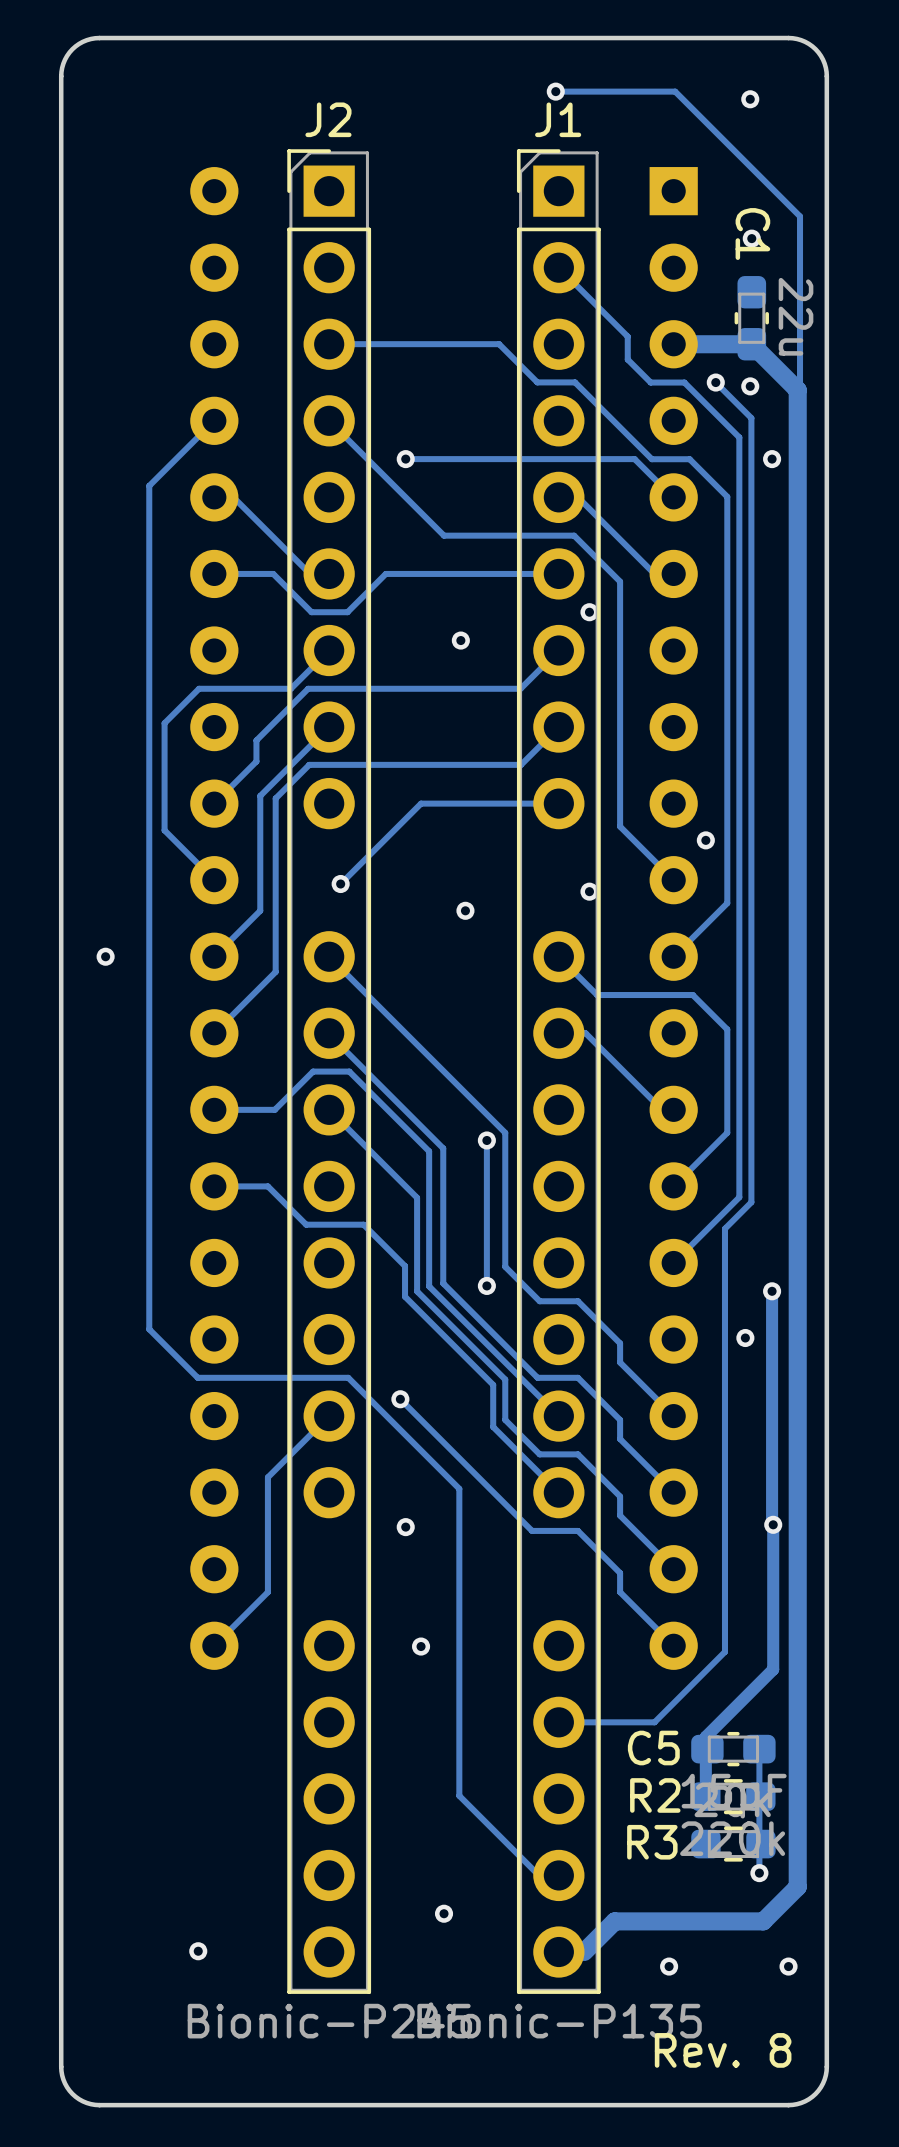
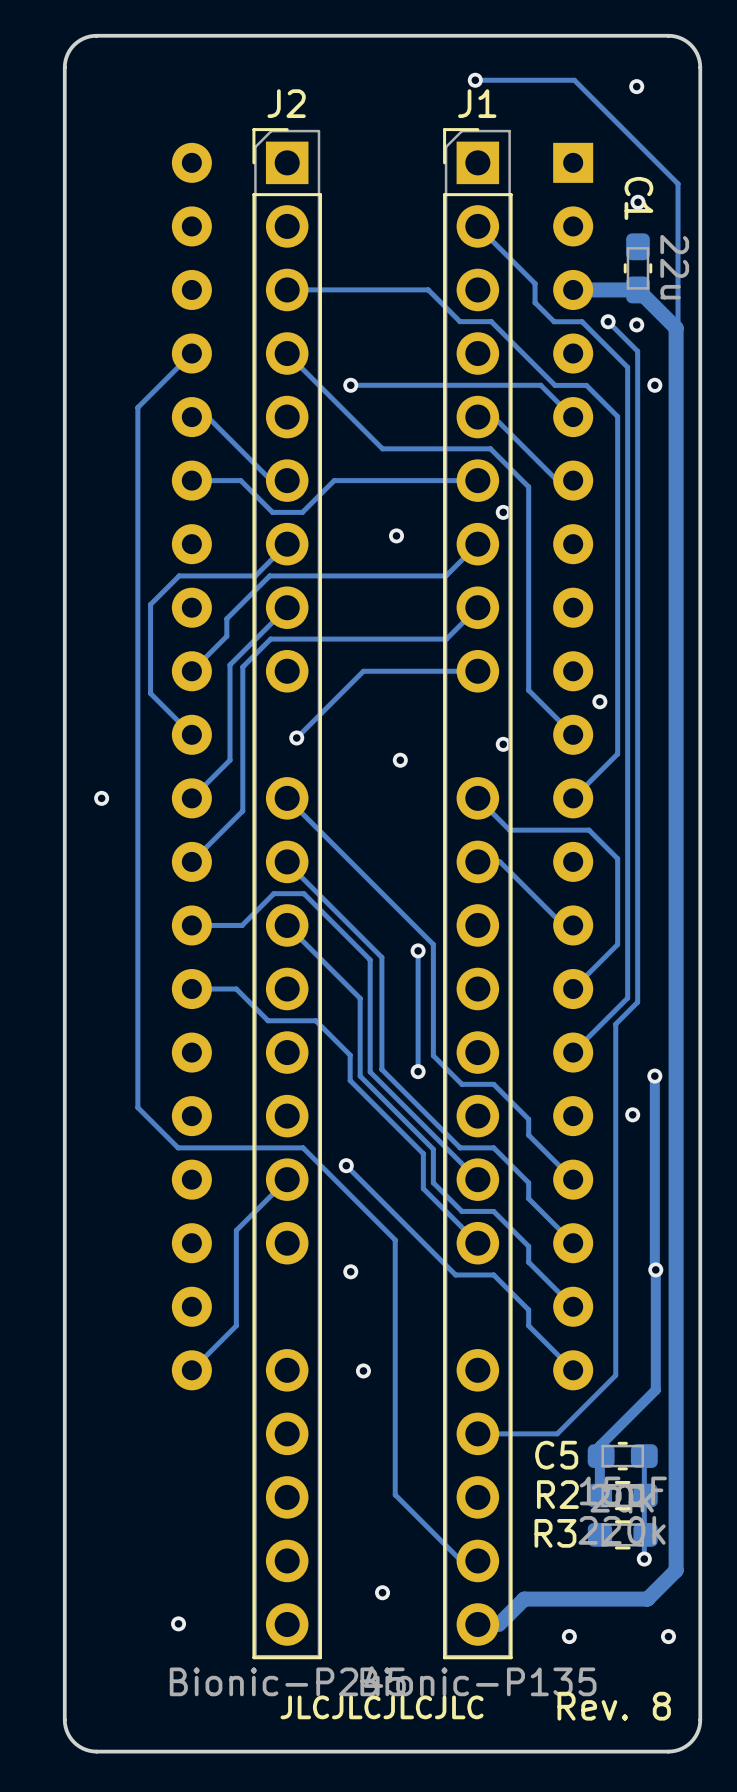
text: none -> JLCJLCJLCJLC (382, 1707)

